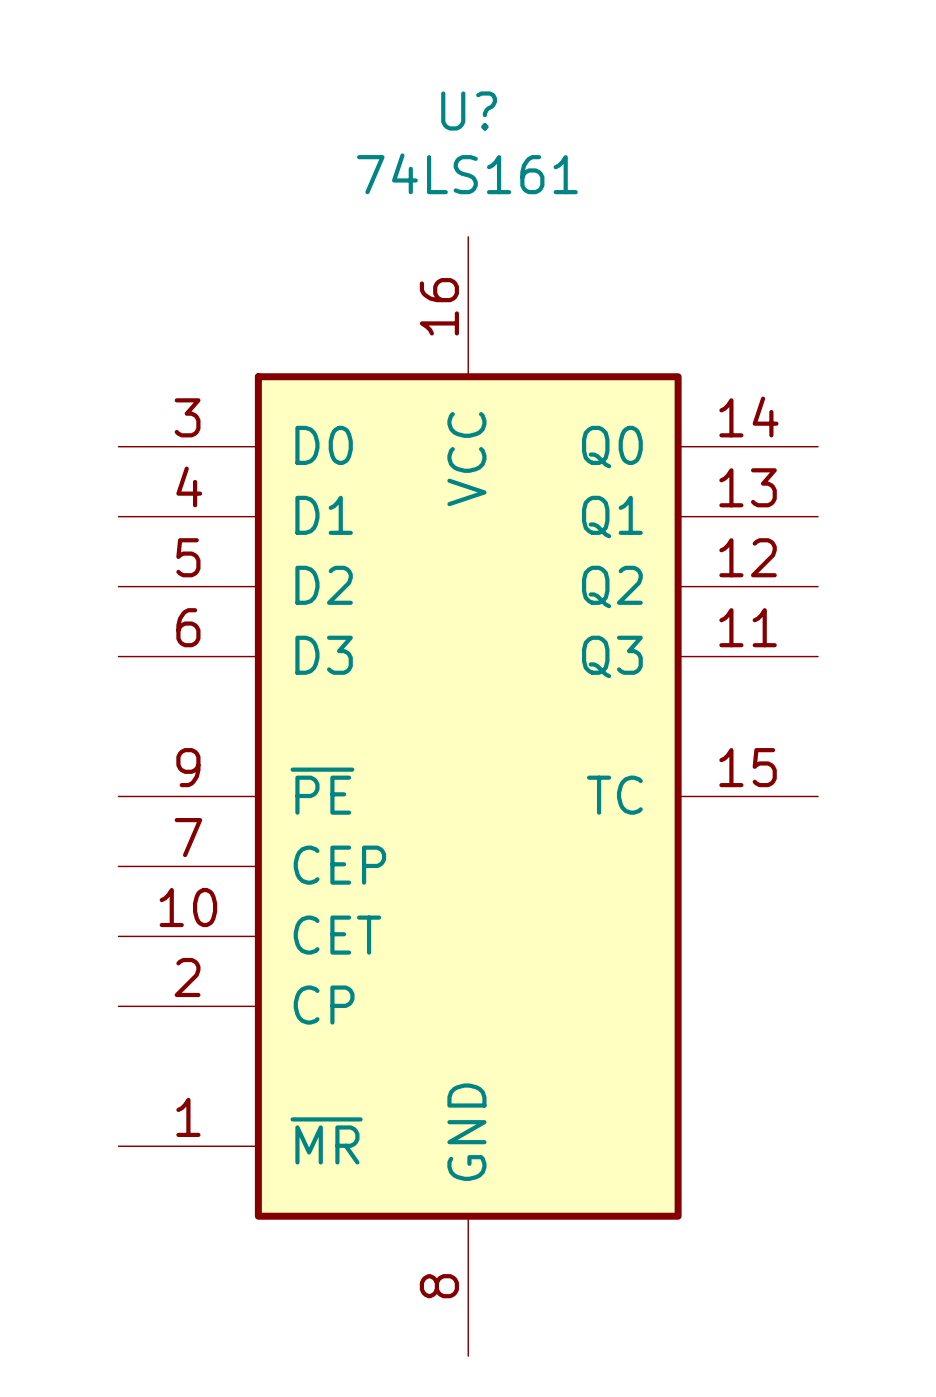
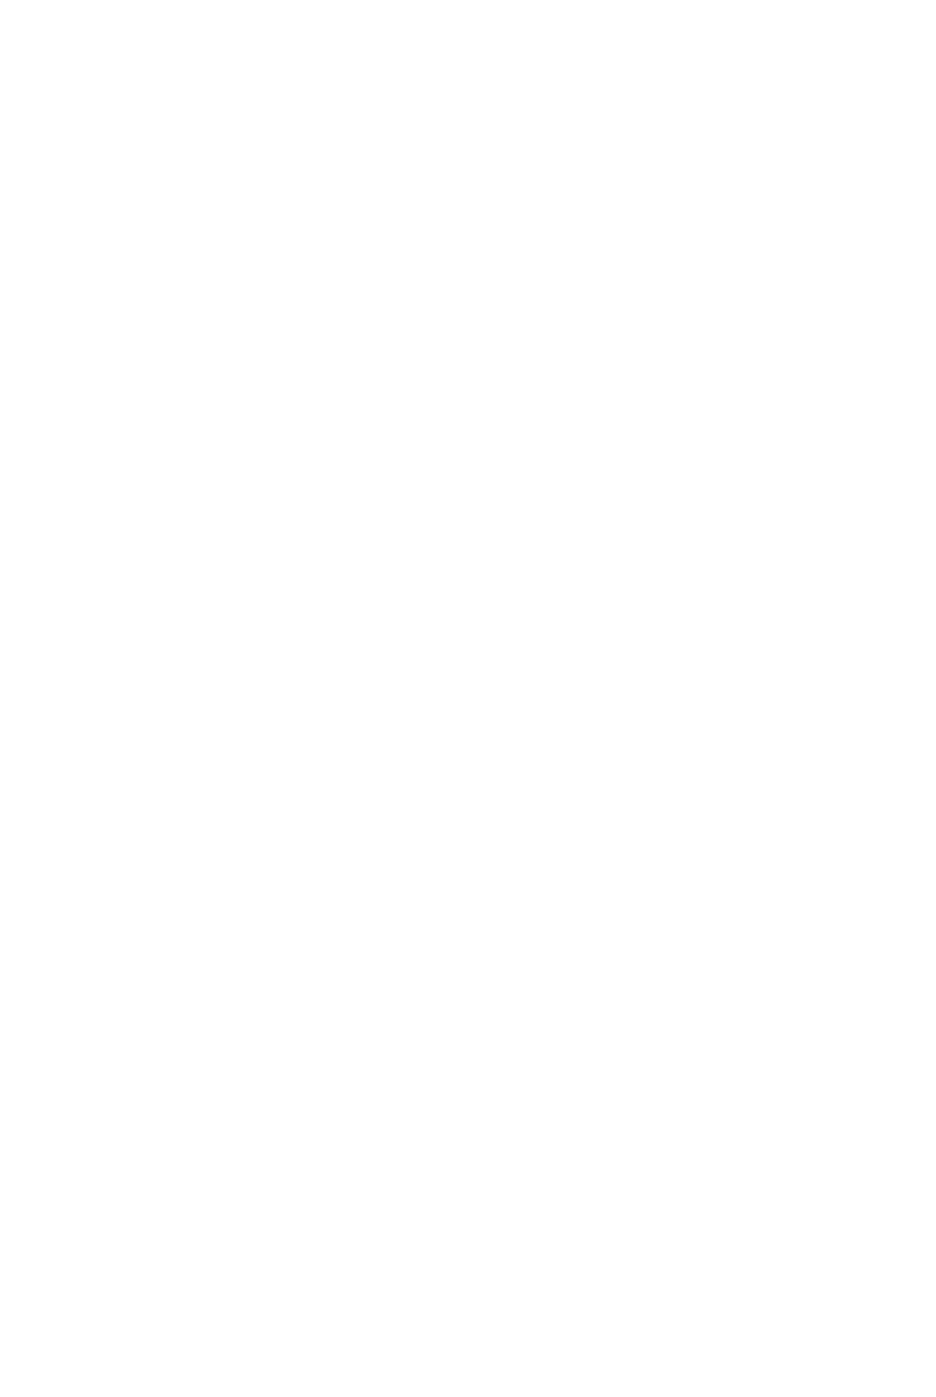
U?: 74LS161 (468, 796) -> none

